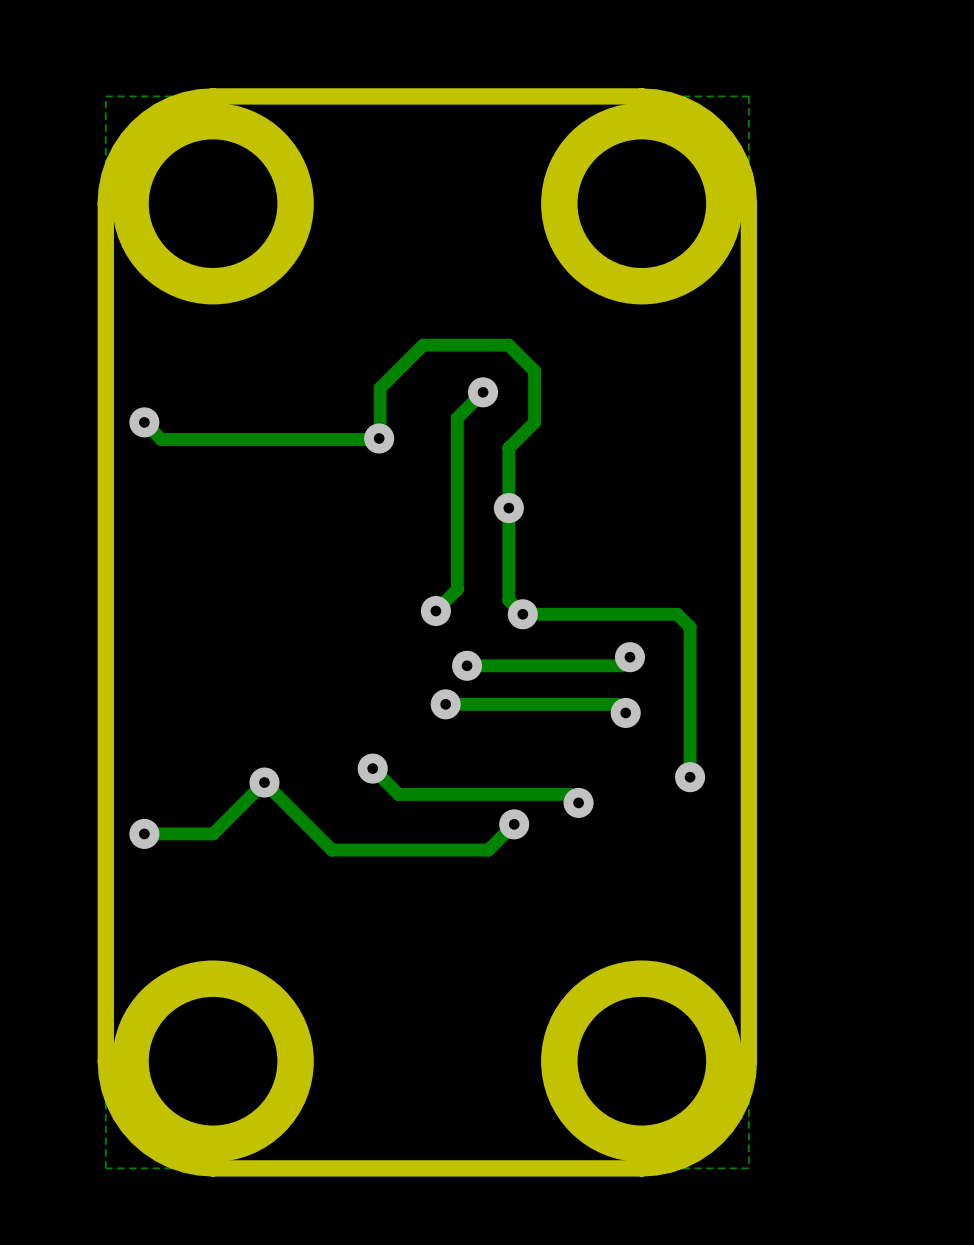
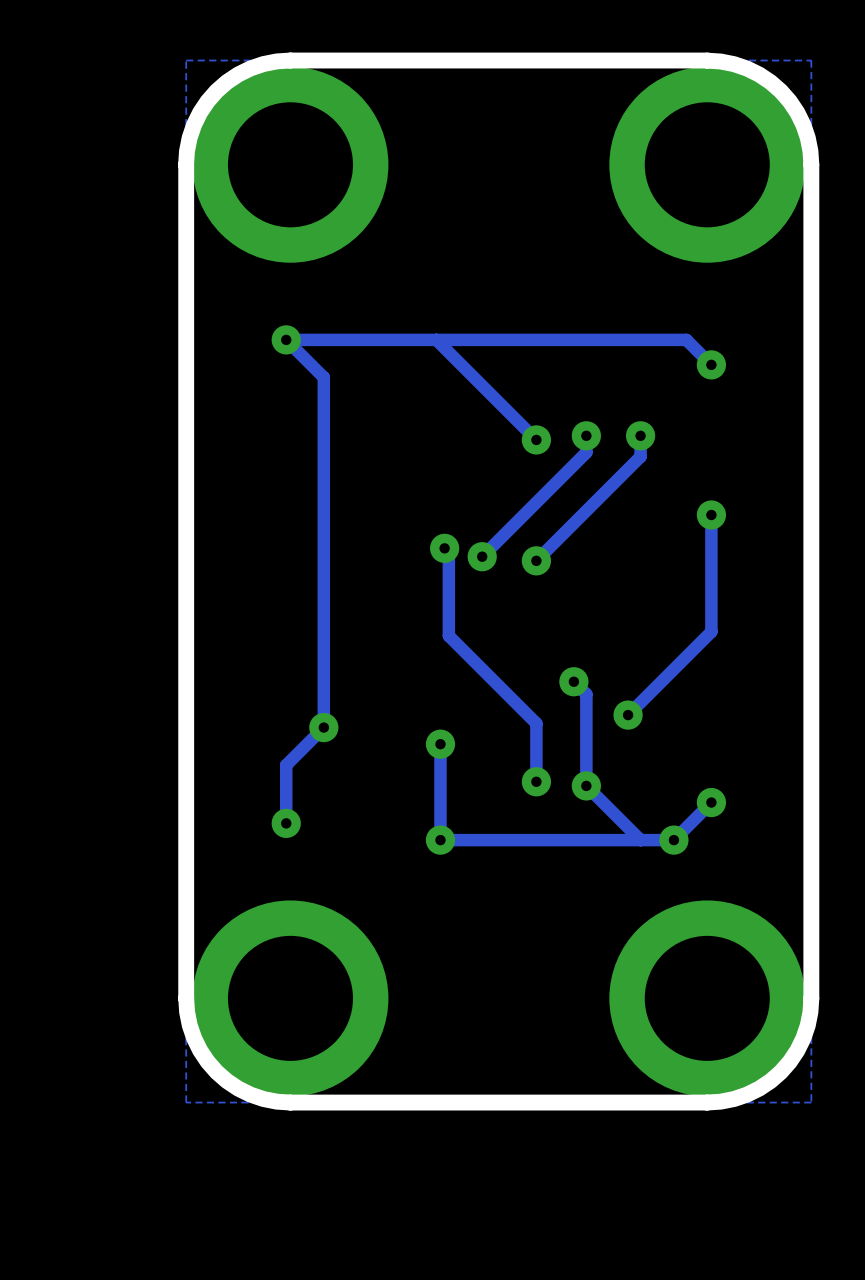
track: none -> (436, 339) (536, 439)
track: (483, 392) (457, 418) (457, 589) (435, 611) -> none
via: (483, 392) -> none
track: none -> (711, 364) (686, 339) (286, 339) (323, 377) (323, 727) (286, 765) (286, 823)
via: none -> (711, 364)
track: (144, 422) (161, 439) (380, 439) (380, 388) (423, 345) (508, 345) (534, 370) (534, 422) (508, 448) (508, 600) (522, 614) (677, 614) (690, 627) (690, 777) -> none
via position: (144, 422) -> (286, 339)
via: (379, 438) -> none
track: none -> (586, 435) (586, 452) (482, 556)
track: none -> (640, 435) (640, 456) (536, 560)
via: none -> (640, 435)
via: none -> (536, 439)
via position: (508, 508) -> (586, 435)
track: none -> (711, 515) (711, 631) (628, 715)
via: none -> (711, 515)
track: none -> (444, 548) (448, 552) (448, 635) (536, 723) (536, 781)
via: none -> (444, 548)
via position: (435, 611) -> (482, 556)
via: none -> (536, 560)
via: (522, 614) -> none
track: (629, 657) (621, 665) (467, 665) -> none
via: (629, 657) -> none
via: (467, 665) -> none
track: (445, 704) (617, 704) (625, 712) -> none
via: (445, 704) -> none
via: (625, 712) -> none
track: none -> (573, 681) (586, 694) (586, 785) (640, 840)
via: none -> (573, 681)
track: (372, 768) (398, 794) (570, 794) (578, 802) -> none
via position: (372, 768) -> (440, 744)
via: none -> (628, 715)
via: (690, 777) -> none
via position: (264, 782) -> (323, 727)
track: none -> (440, 744) (440, 840) (673, 840) (711, 802)
via: (578, 802) -> none
track: (514, 824) (488, 850) (332, 850) (264, 782) (213, 833) (144, 833) -> none
via position: (514, 824) -> (586, 785)
via: (144, 833) -> none
via: none -> (536, 781)
via: none -> (711, 802)
via: none -> (286, 823)
via: none -> (440, 840)
via: none -> (673, 840)

